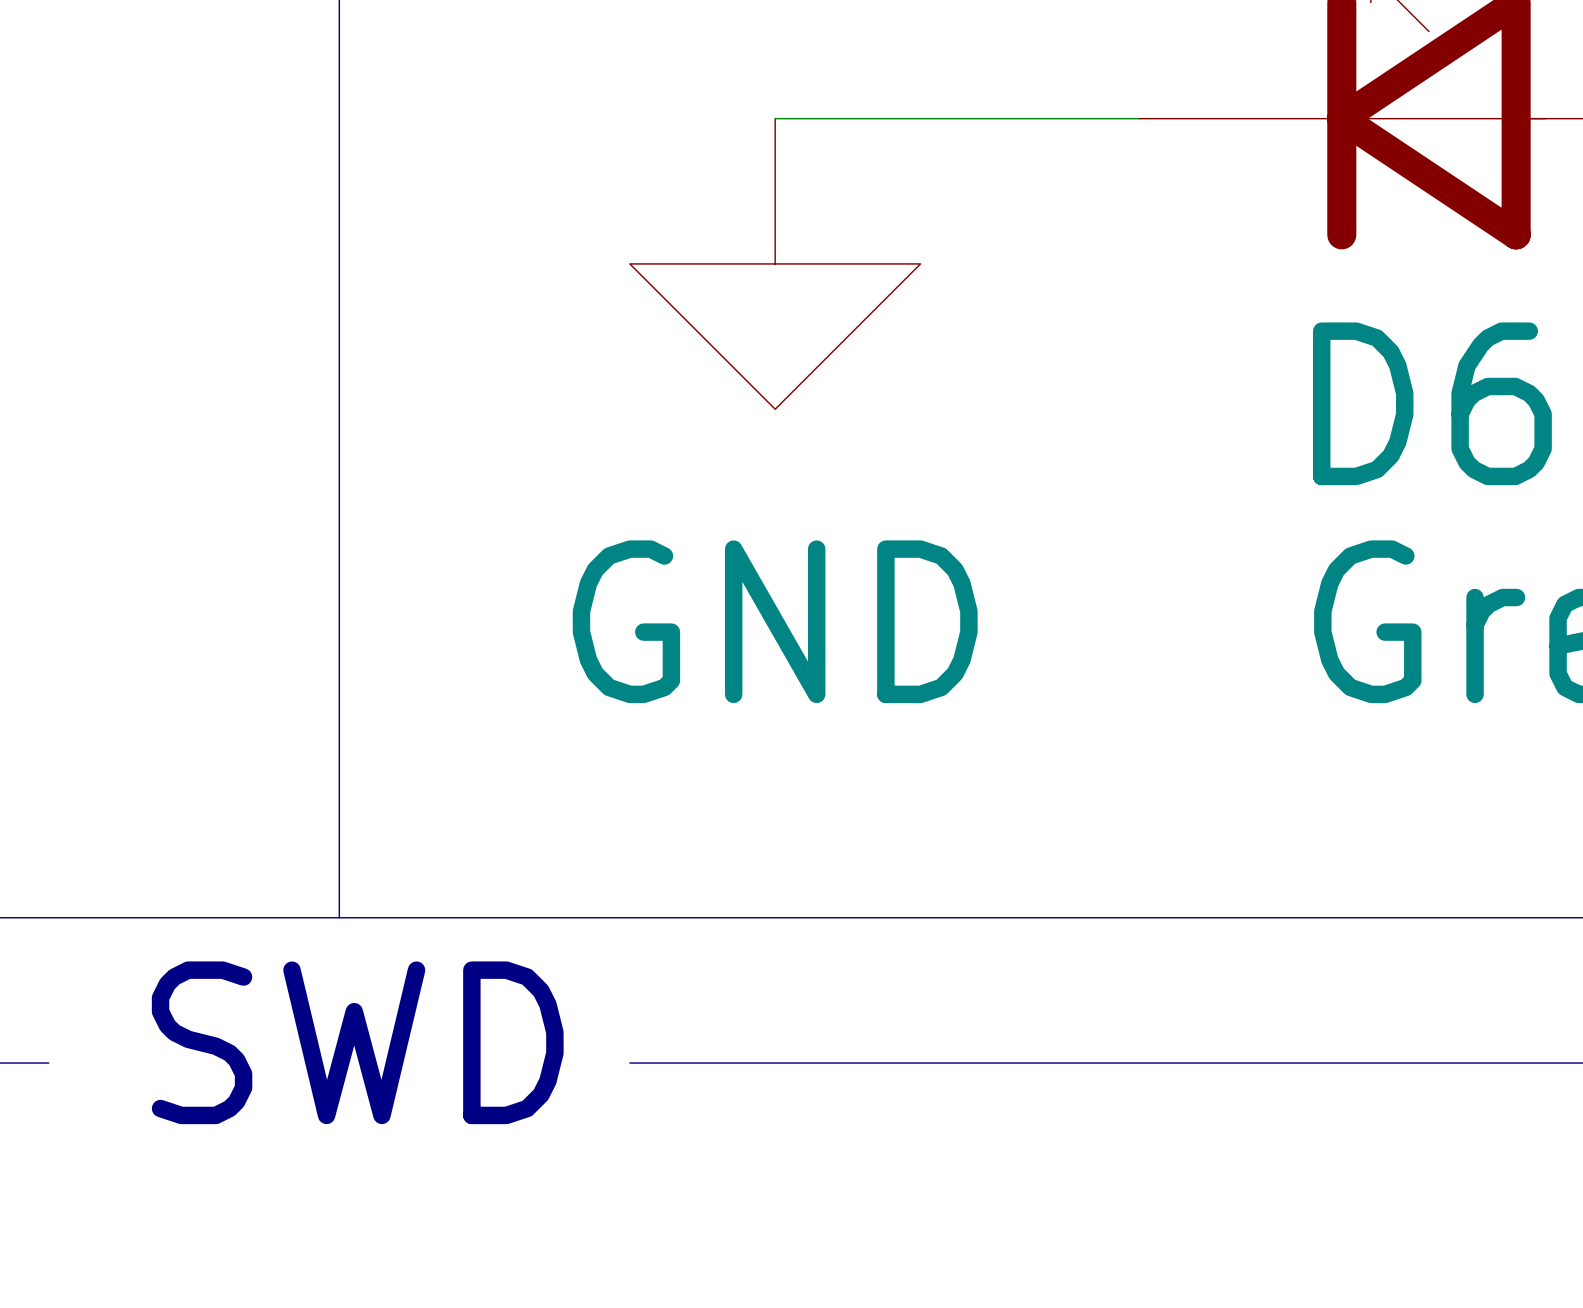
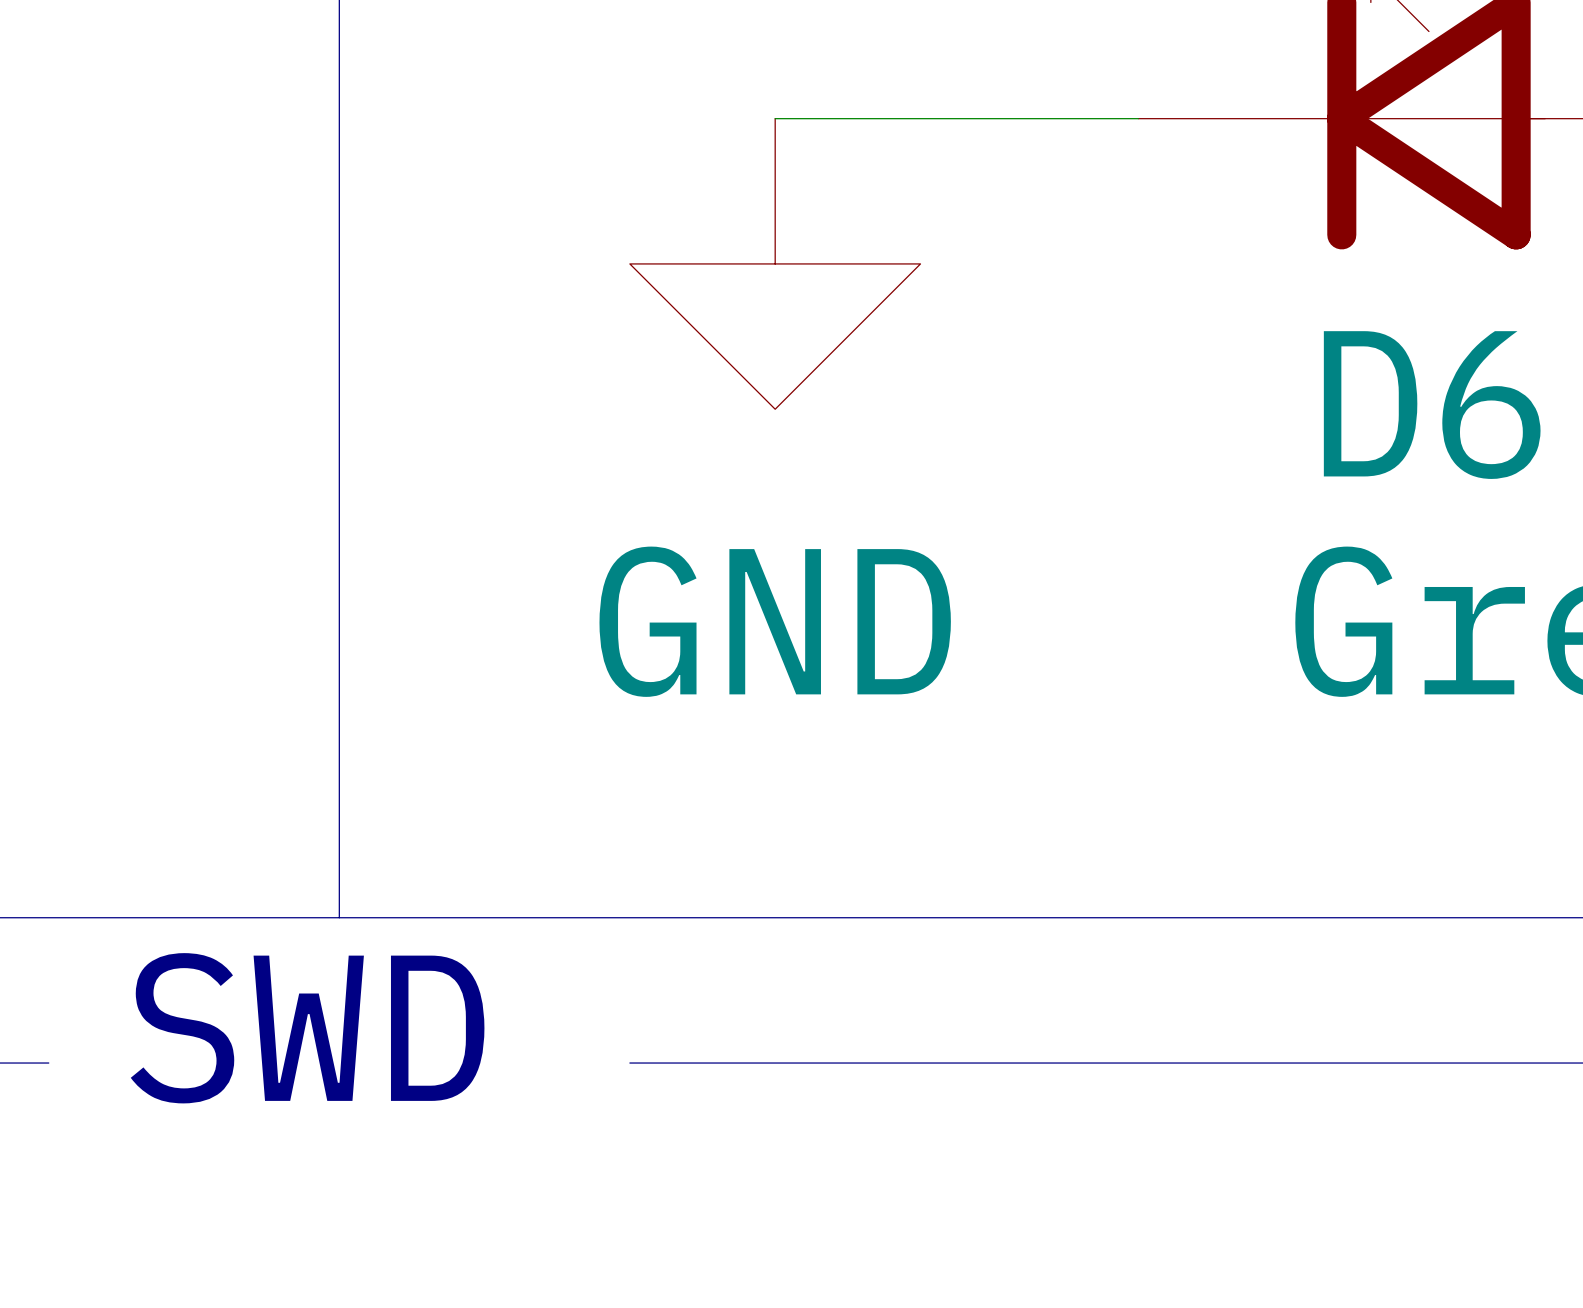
text position: SWD (357, 1042) -> SWD (307, 1028)

